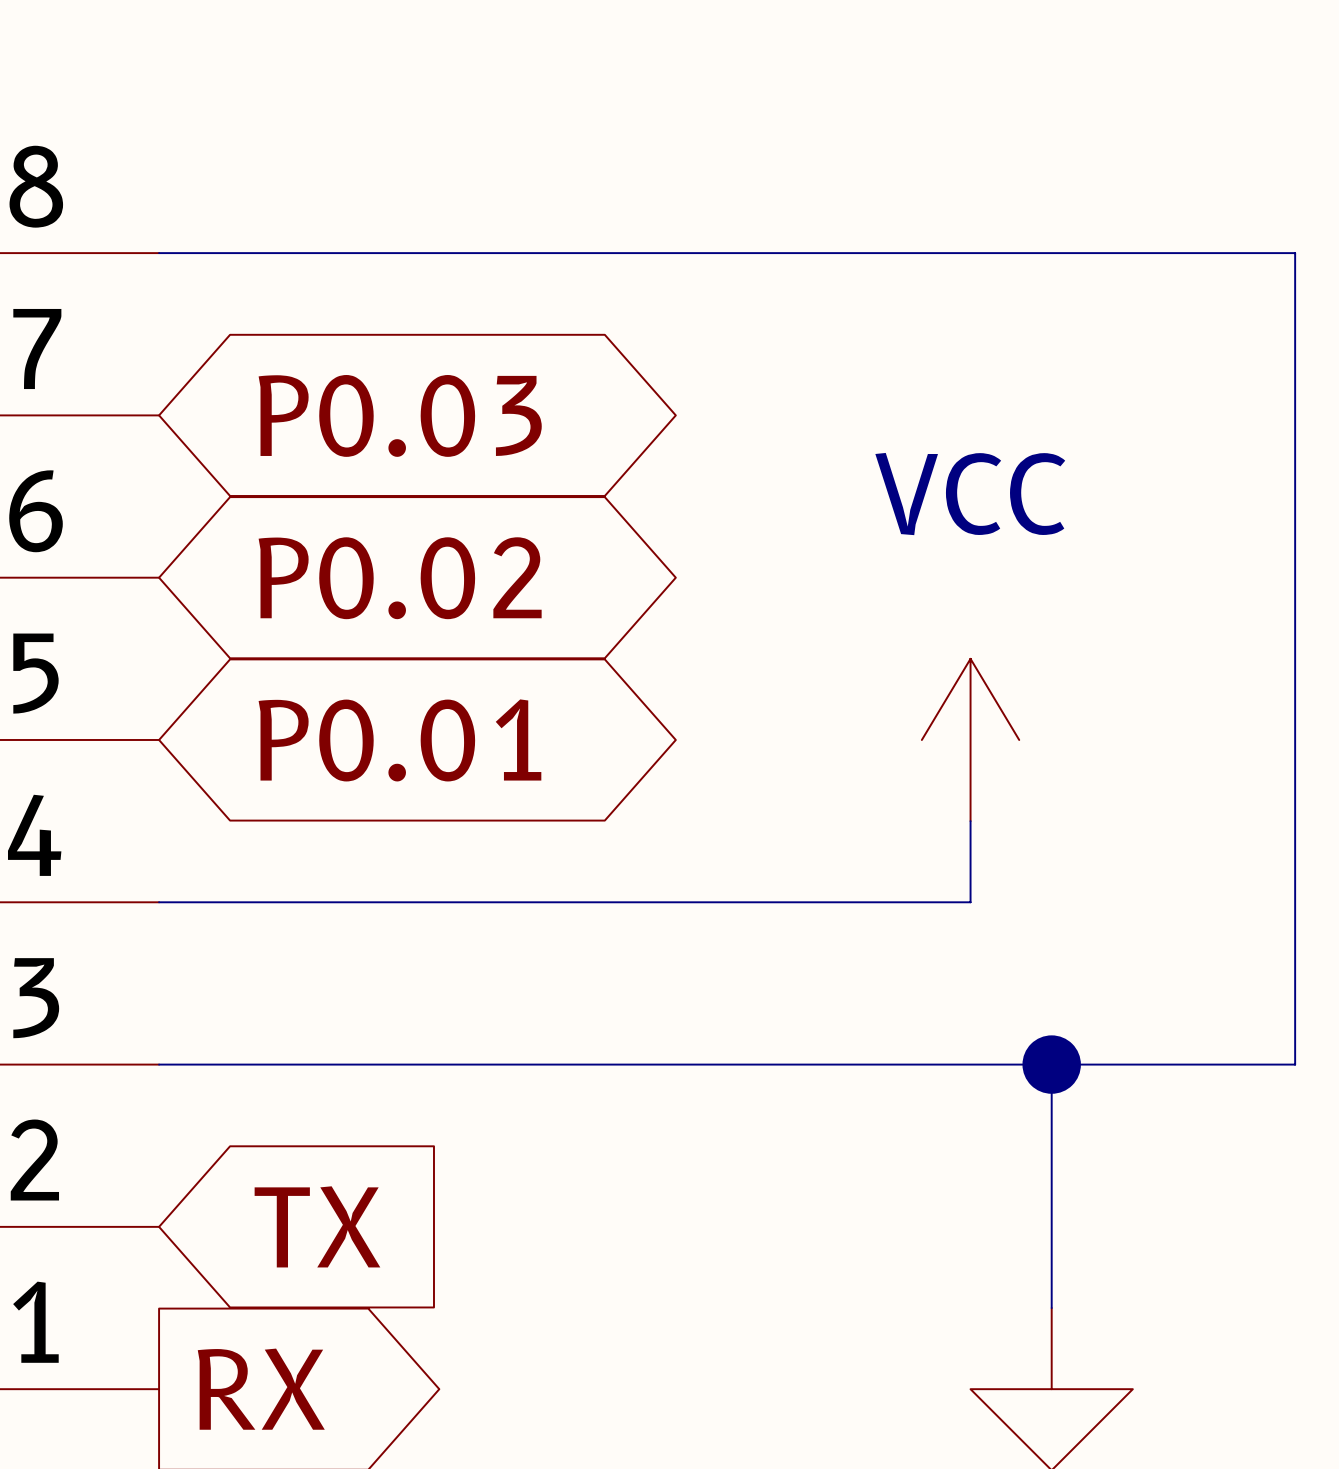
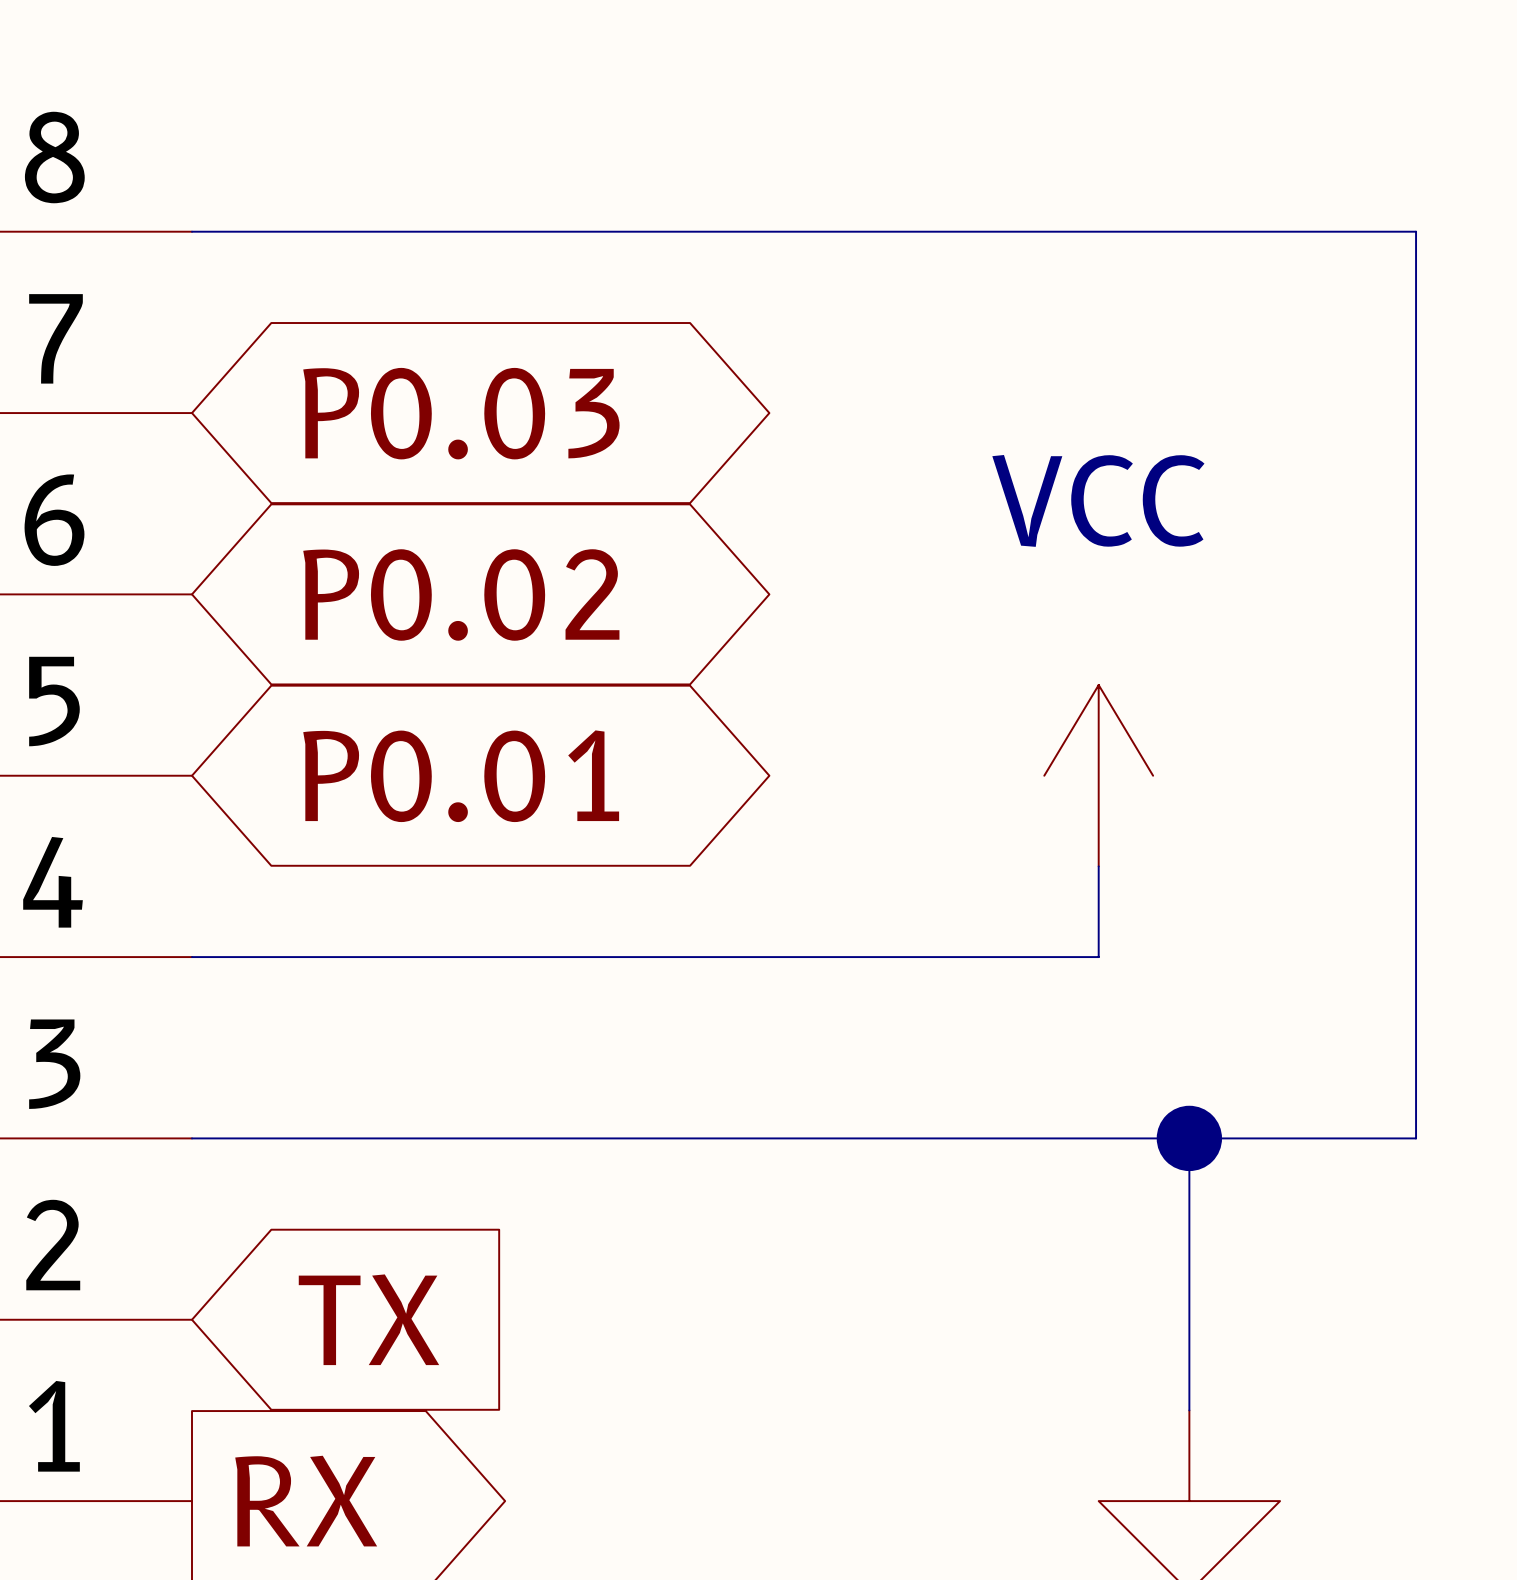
wire: (1254, 253) (1295, 253) (1295, 1064) (1254, 1064) -> (1416, 231) (1416, 1138)

